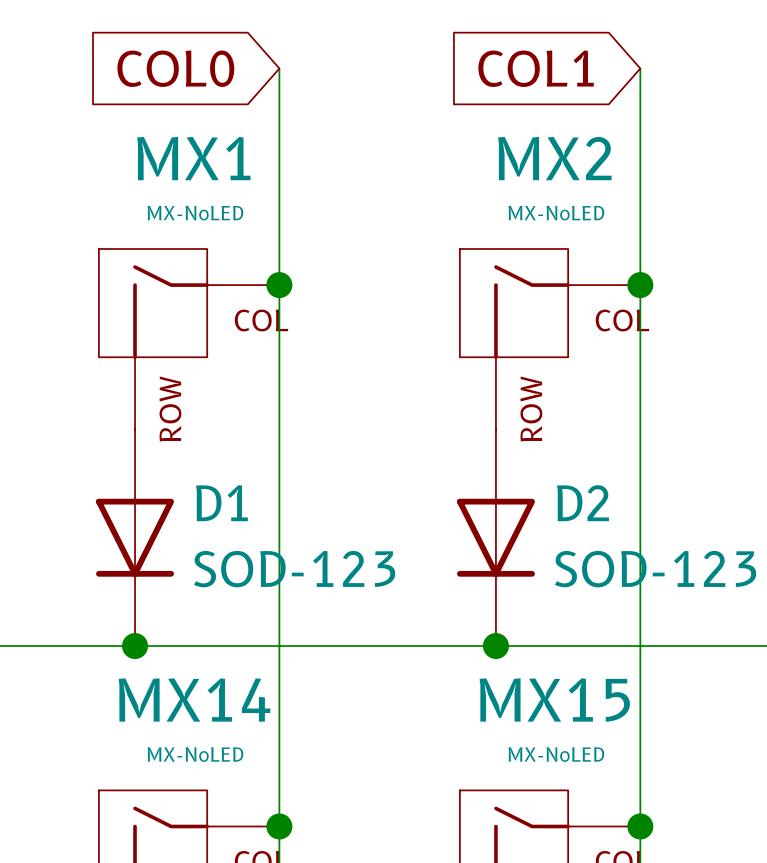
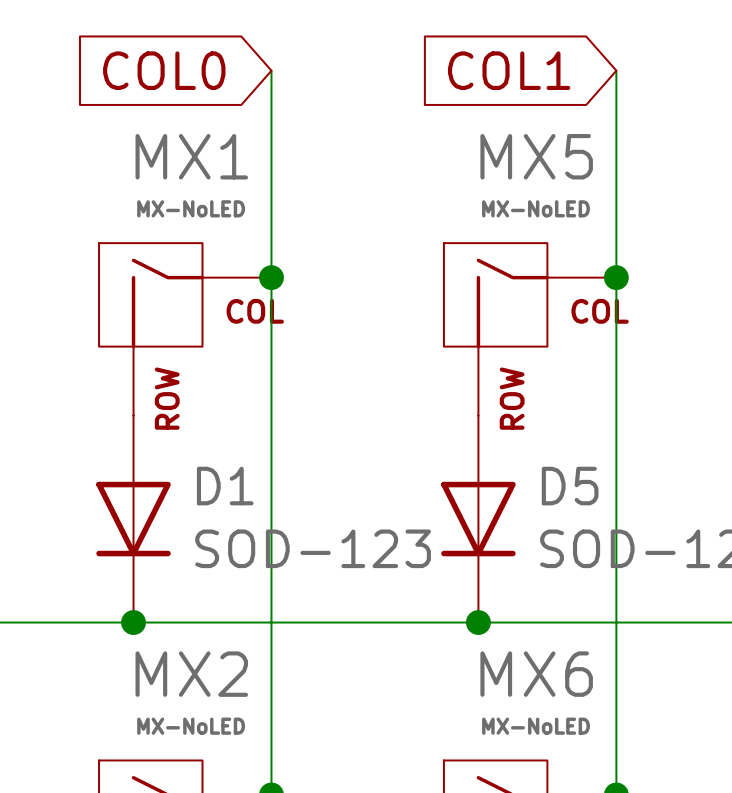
MX2 name: MX2 (554, 158) -> MX5 (536, 156)
D2 name: D2 (582, 503) -> D5 (570, 486)
MX14 name: MX14 (194, 699) -> MX2 (191, 674)
MX15 name: MX15 (554, 699) -> MX6 (536, 674)

